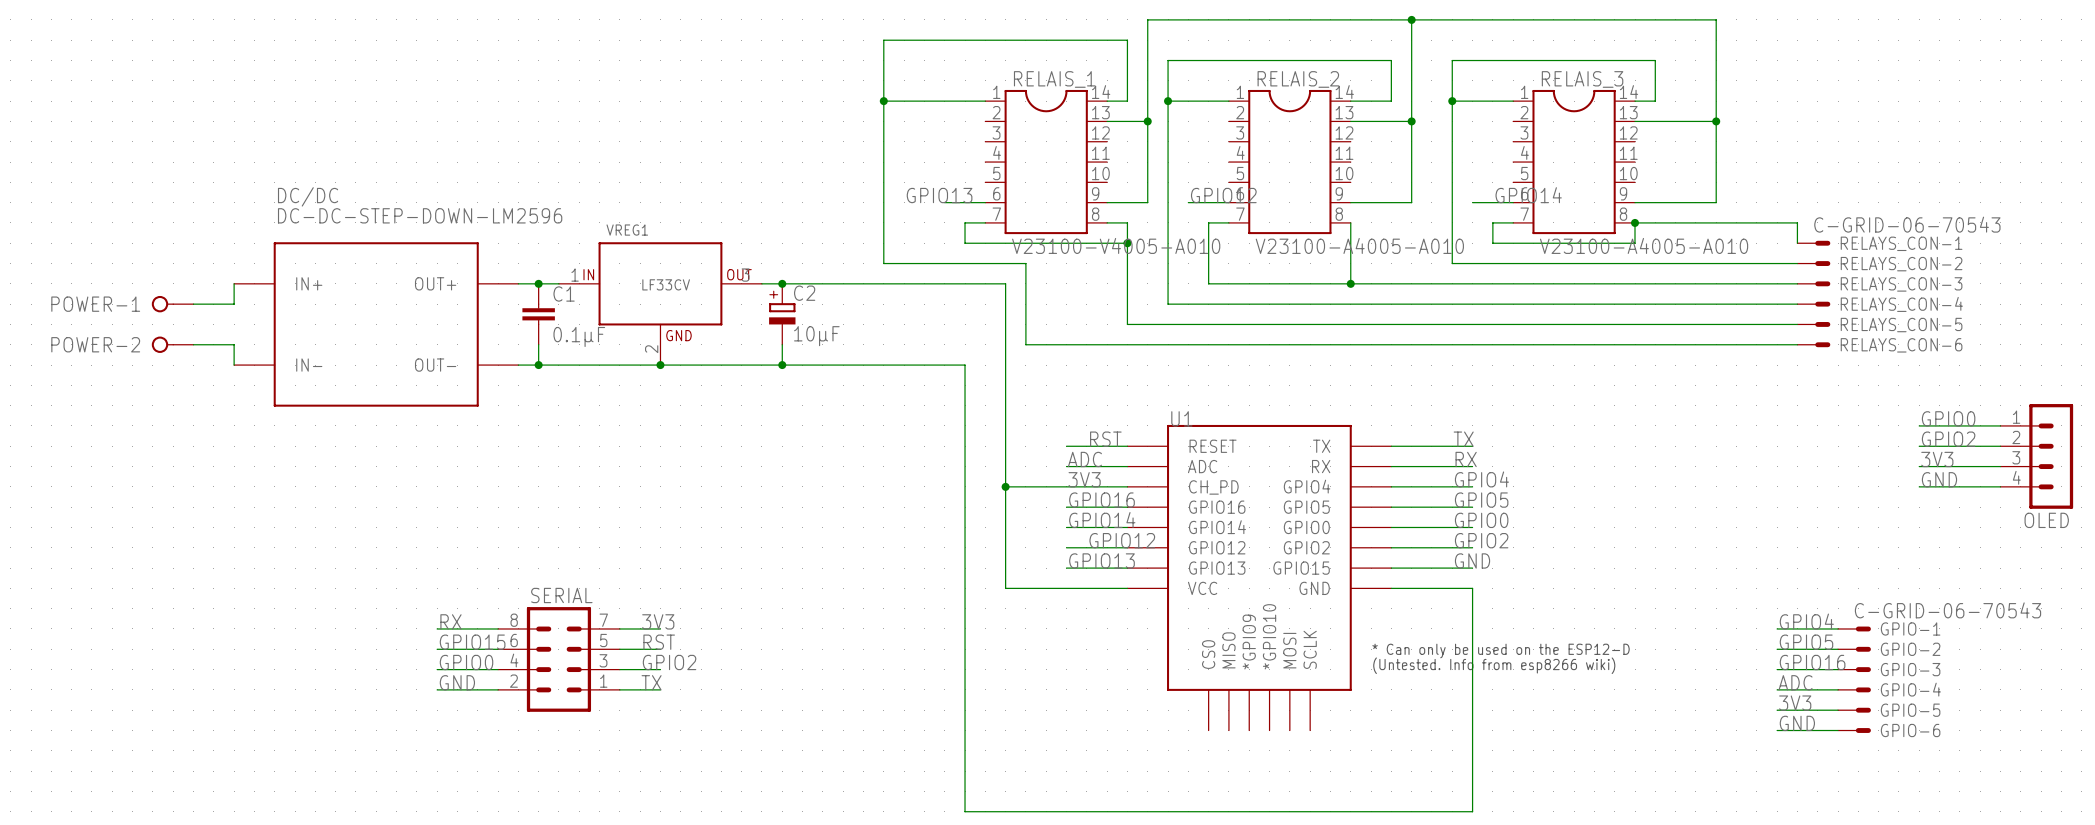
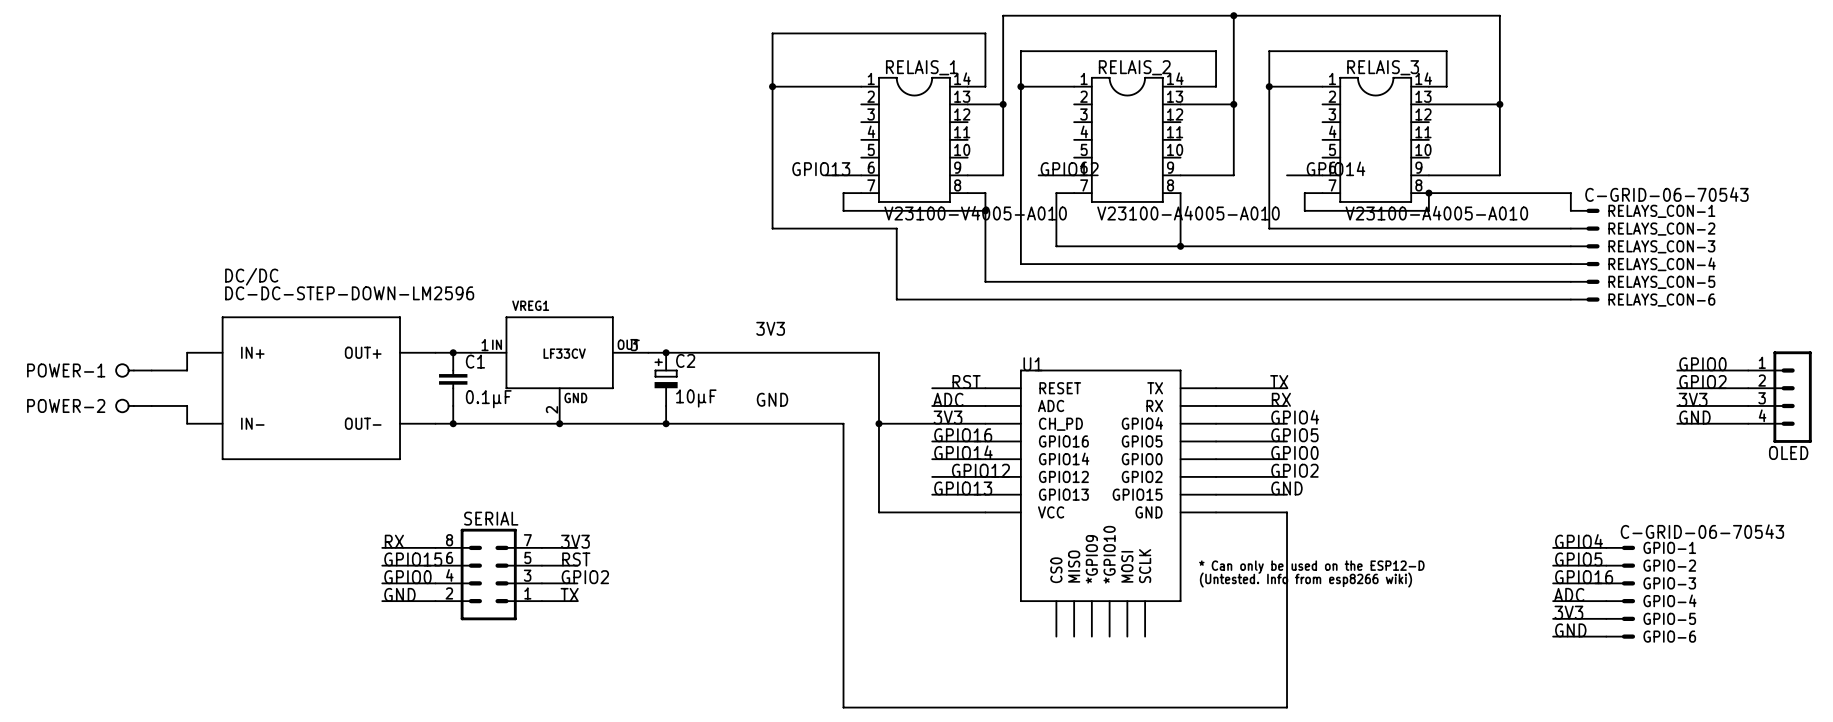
wire: (234, 283) (234, 304) (193, 304) -> (187, 352) (187, 370) (151, 370)
wire: (518, 283) (558, 283) -> (435, 352) (470, 352)
junction: (538, 283) -> none
wire: (761, 283) (1005, 283) (1005, 405) -> (648, 352) (878, 352)
junction: (782, 283) -> none
VREG1 position: (660, 303) -> (559, 370)
POWER-1 position: (172, 304) -> (133, 370)
C1 position: (538, 314) -> (453, 379)
C2 position: (782, 314) -> (666, 379)
DC/DC position: (376, 324) -> (311, 388)
POWER-2 position: (172, 344) -> (133, 405)
wire: (193, 344) (234, 344) (234, 365) -> (151, 405) (187, 405) (187, 423)
wire: (538, 344) (538, 365) -> (453, 405) (453, 423)
wire: (782, 344) (782, 365) -> (666, 405) (666, 423)
wire: (518, 365) (965, 365) (965, 486) -> (435, 423) (843, 423)
junction position: (538, 365) -> (453, 352)
junction: (660, 365) -> none
junction position: (782, 365) -> (666, 352)
label: none -> 3V3 (770, 328)
label: none -> GND (772, 399)
junction: none -> (453, 423)
junction: none -> (559, 423)
junction: none -> (666, 423)

